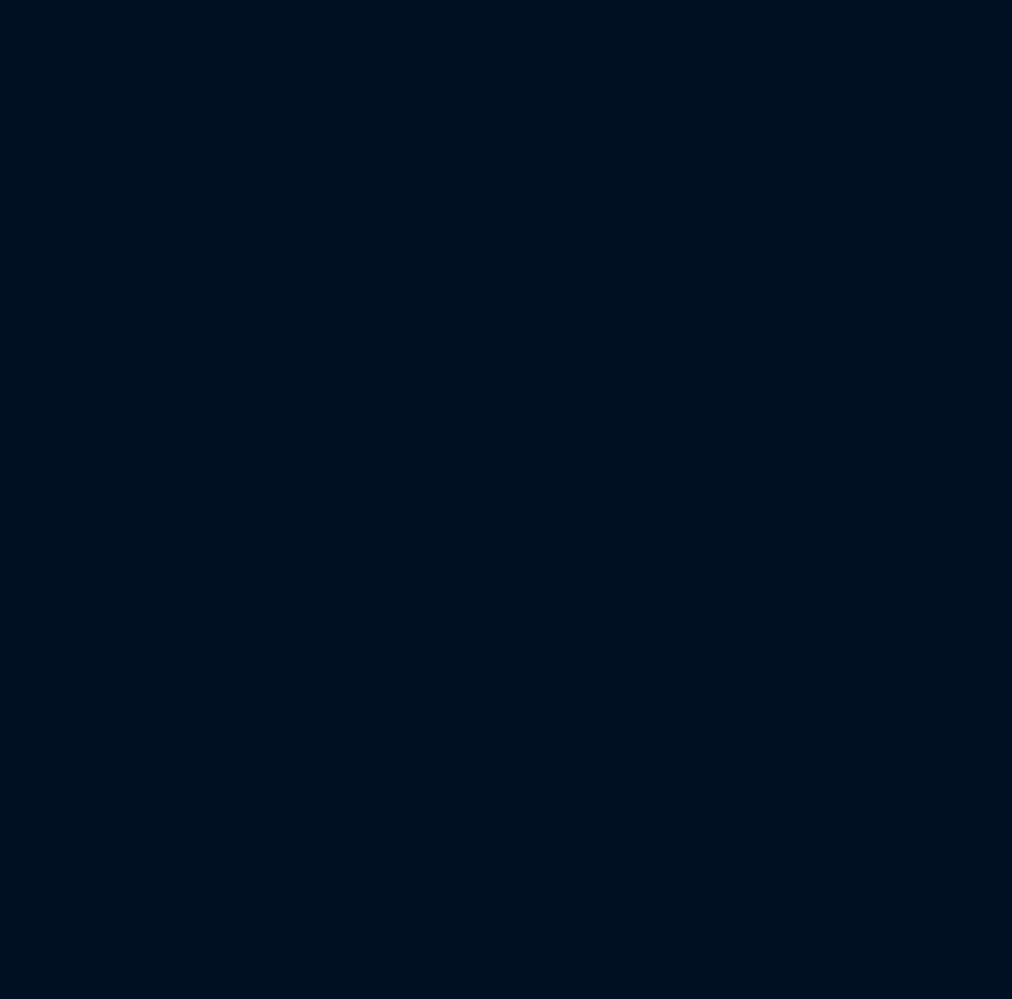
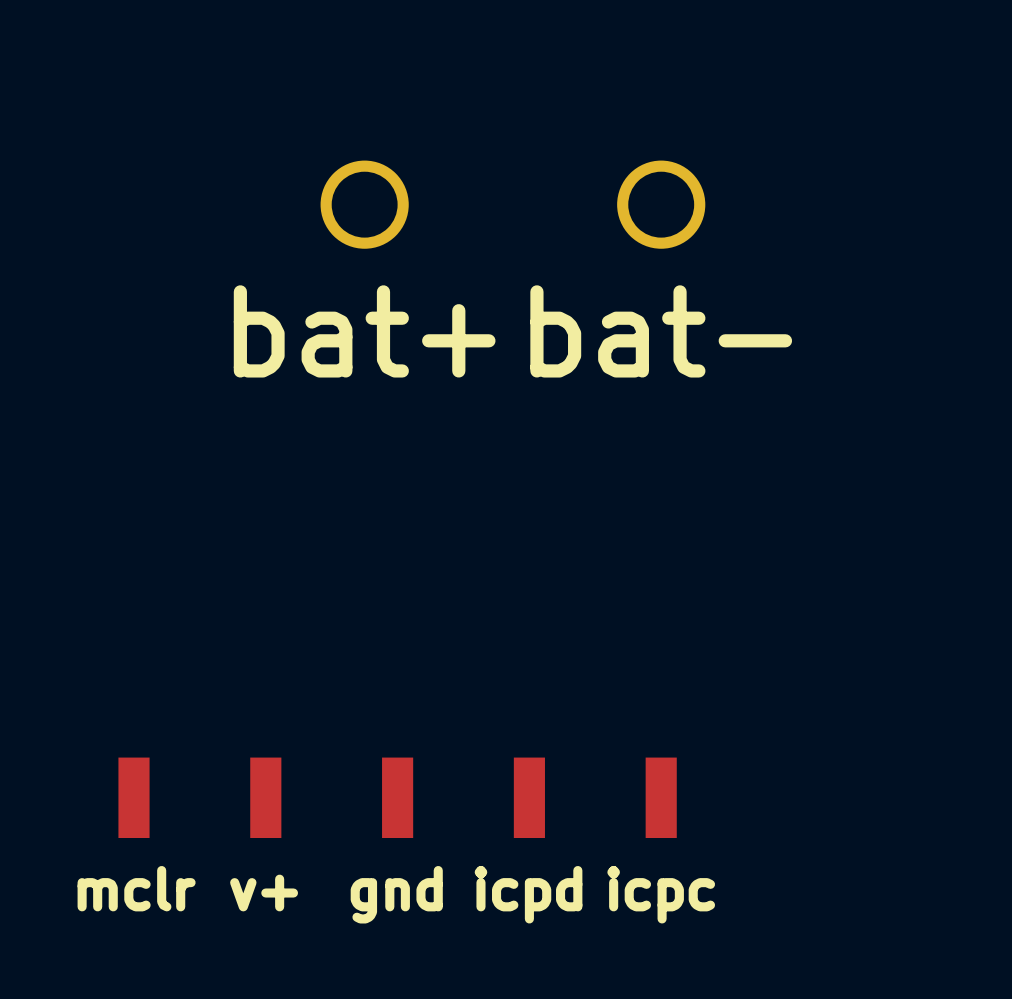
part: none -> bat+ (364, 204)
part: none -> bat- (661, 204)
part: none -> mclr (134, 797)
part: none -> v+ (265, 797)
part: none -> gnd (397, 797)
part: none -> icpd (529, 797)
part: none -> icpc (661, 797)

